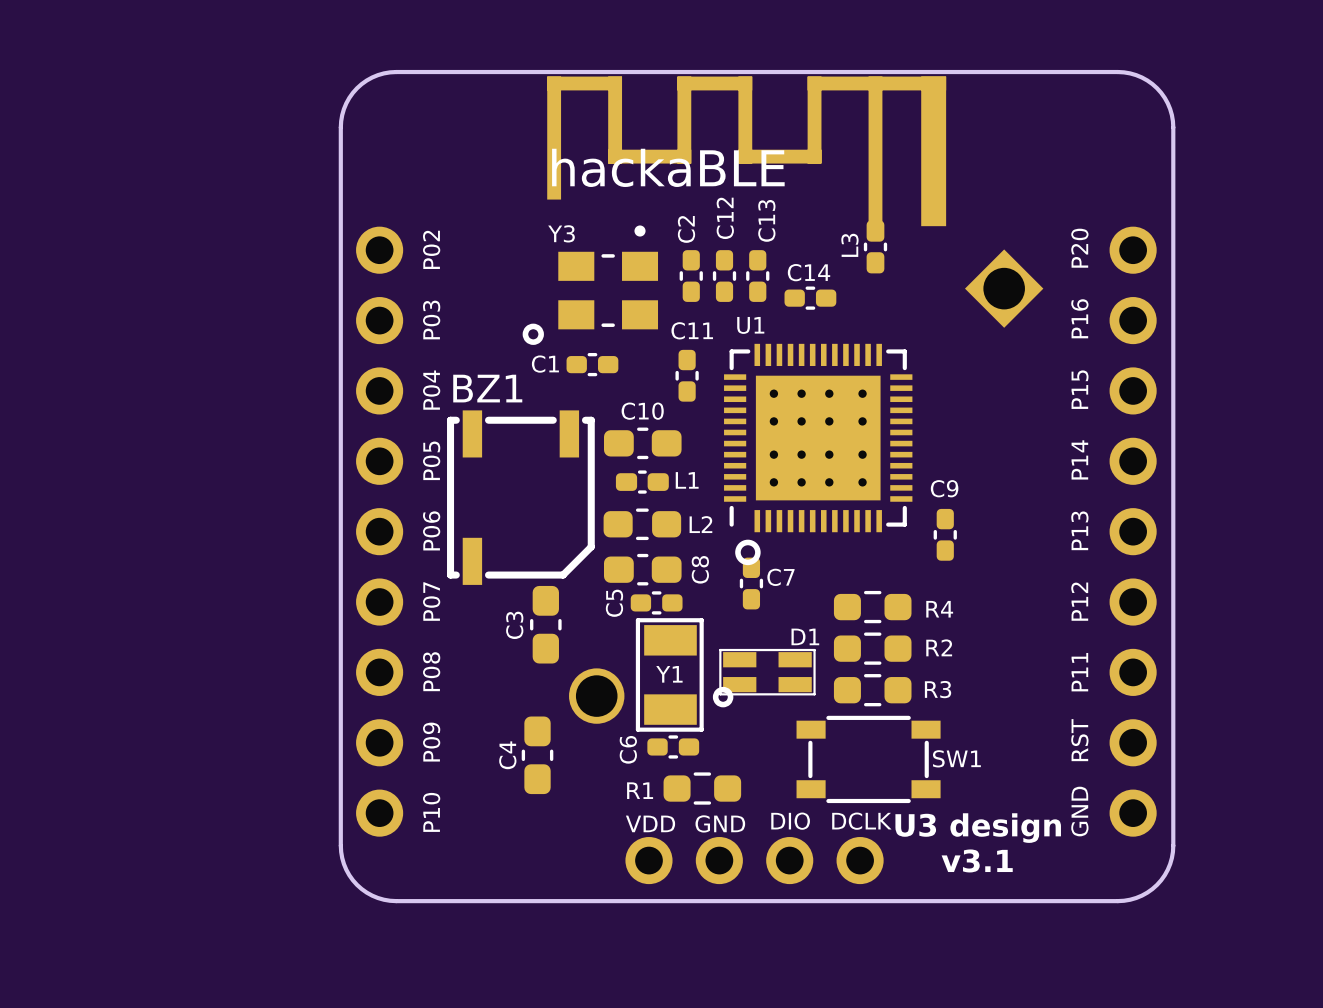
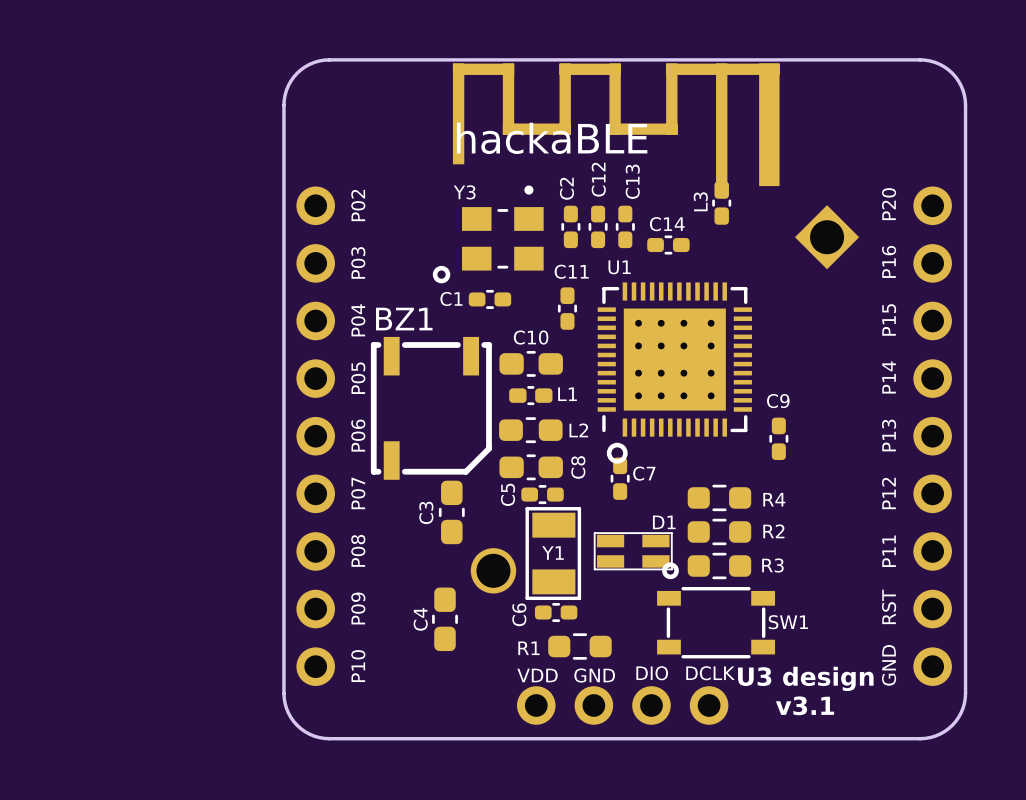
drawing position: (723, 697) -> (670, 570)

